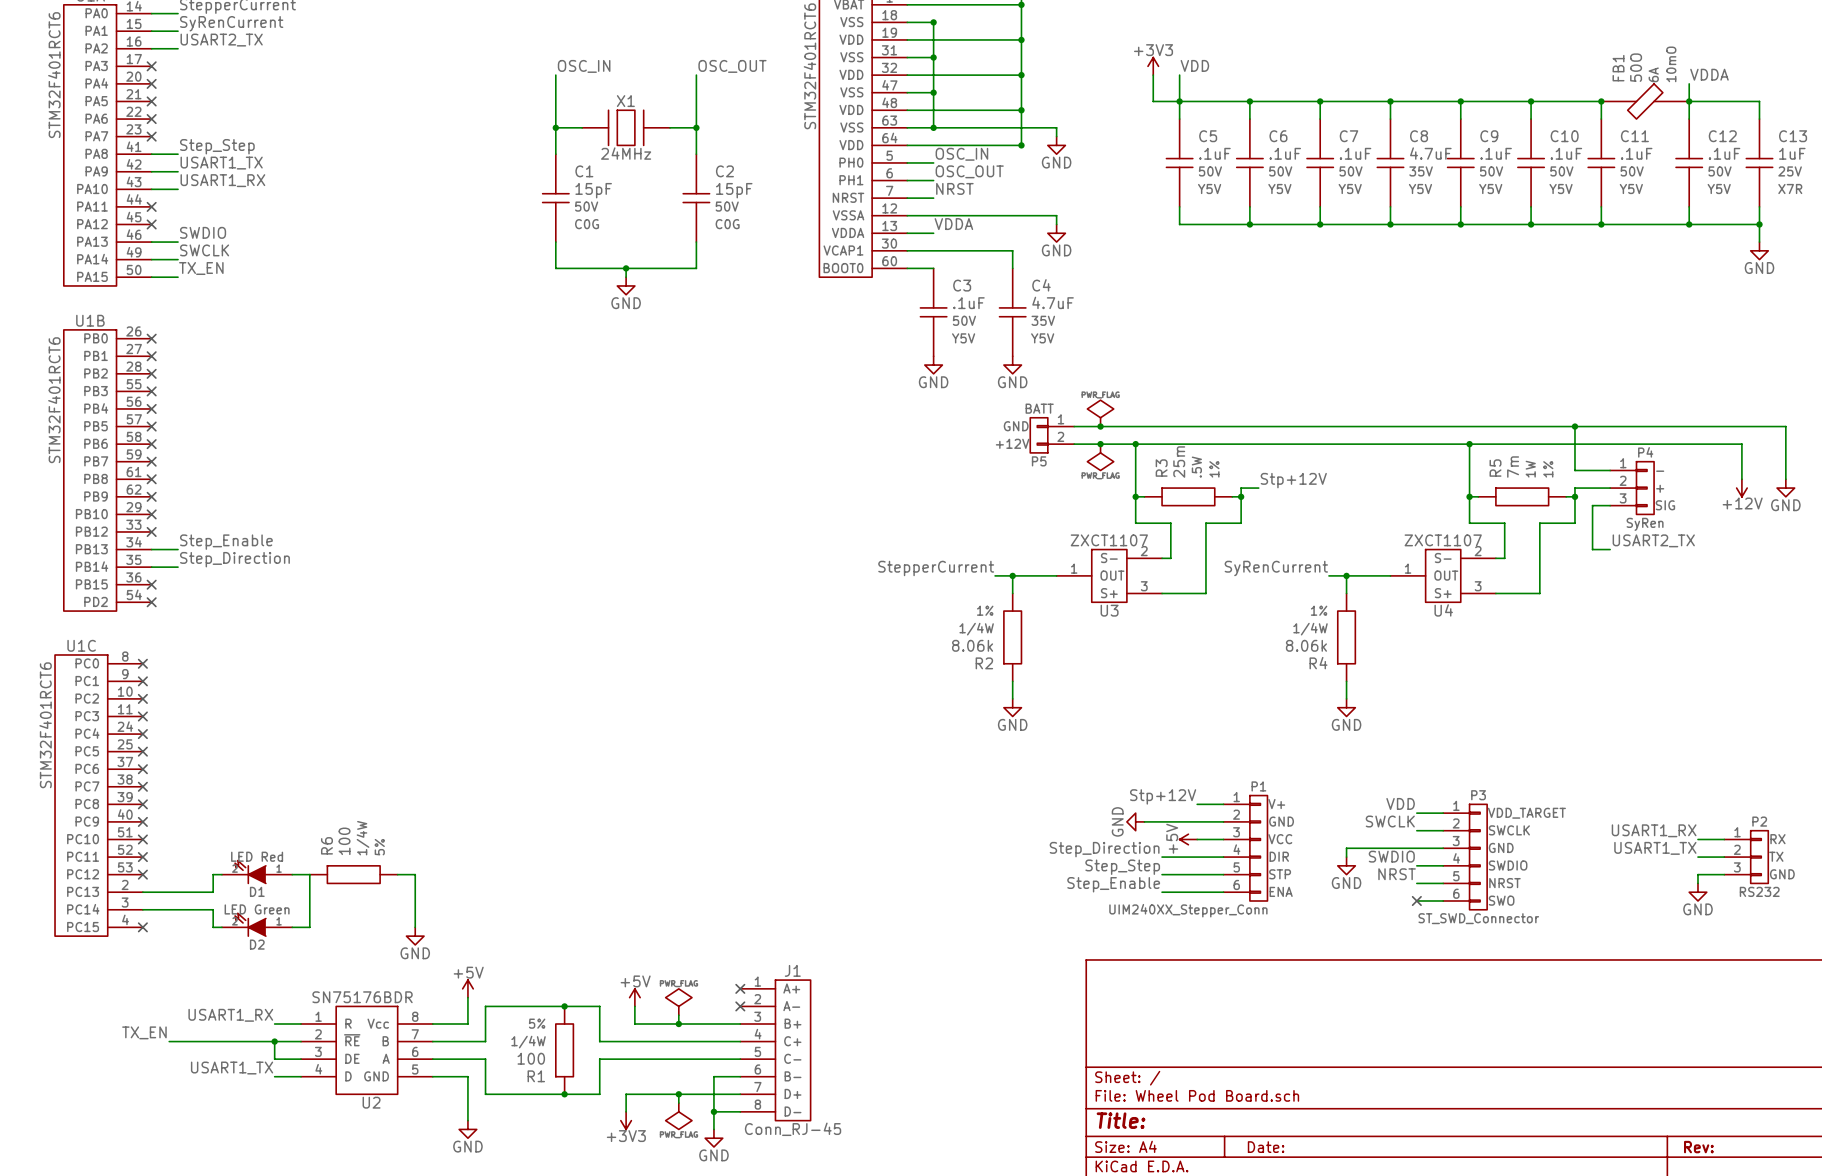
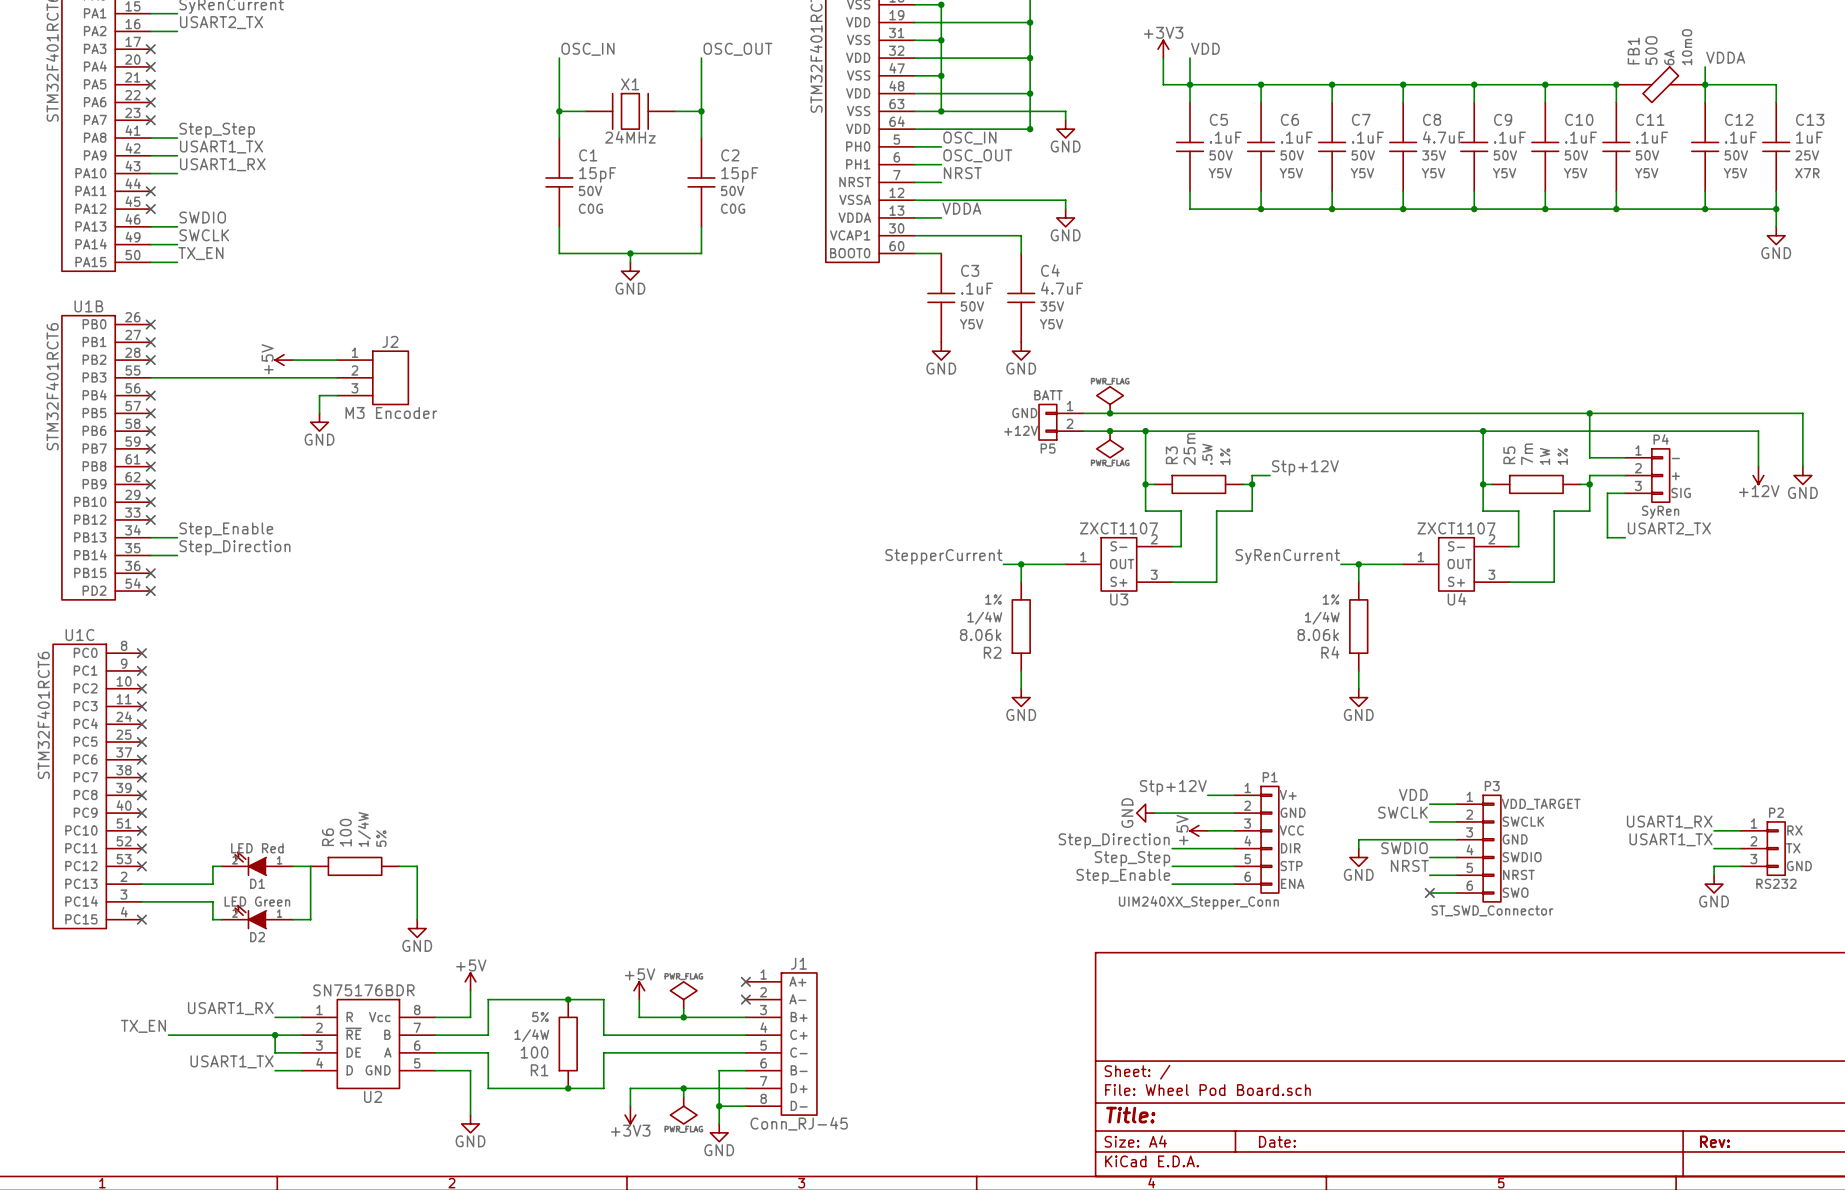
power symbol: none -> +5V (284, 360)
wire: none -> (292, 360) (337, 360)
wire: none -> (150, 377) (337, 377)
no-connect mark: (151, 391) -> none
J2: none -> M3 Encoder (372, 377)
wire: none -> (337, 395) (319, 395) (319, 413)
power symbol: none -> GND (319, 422)

